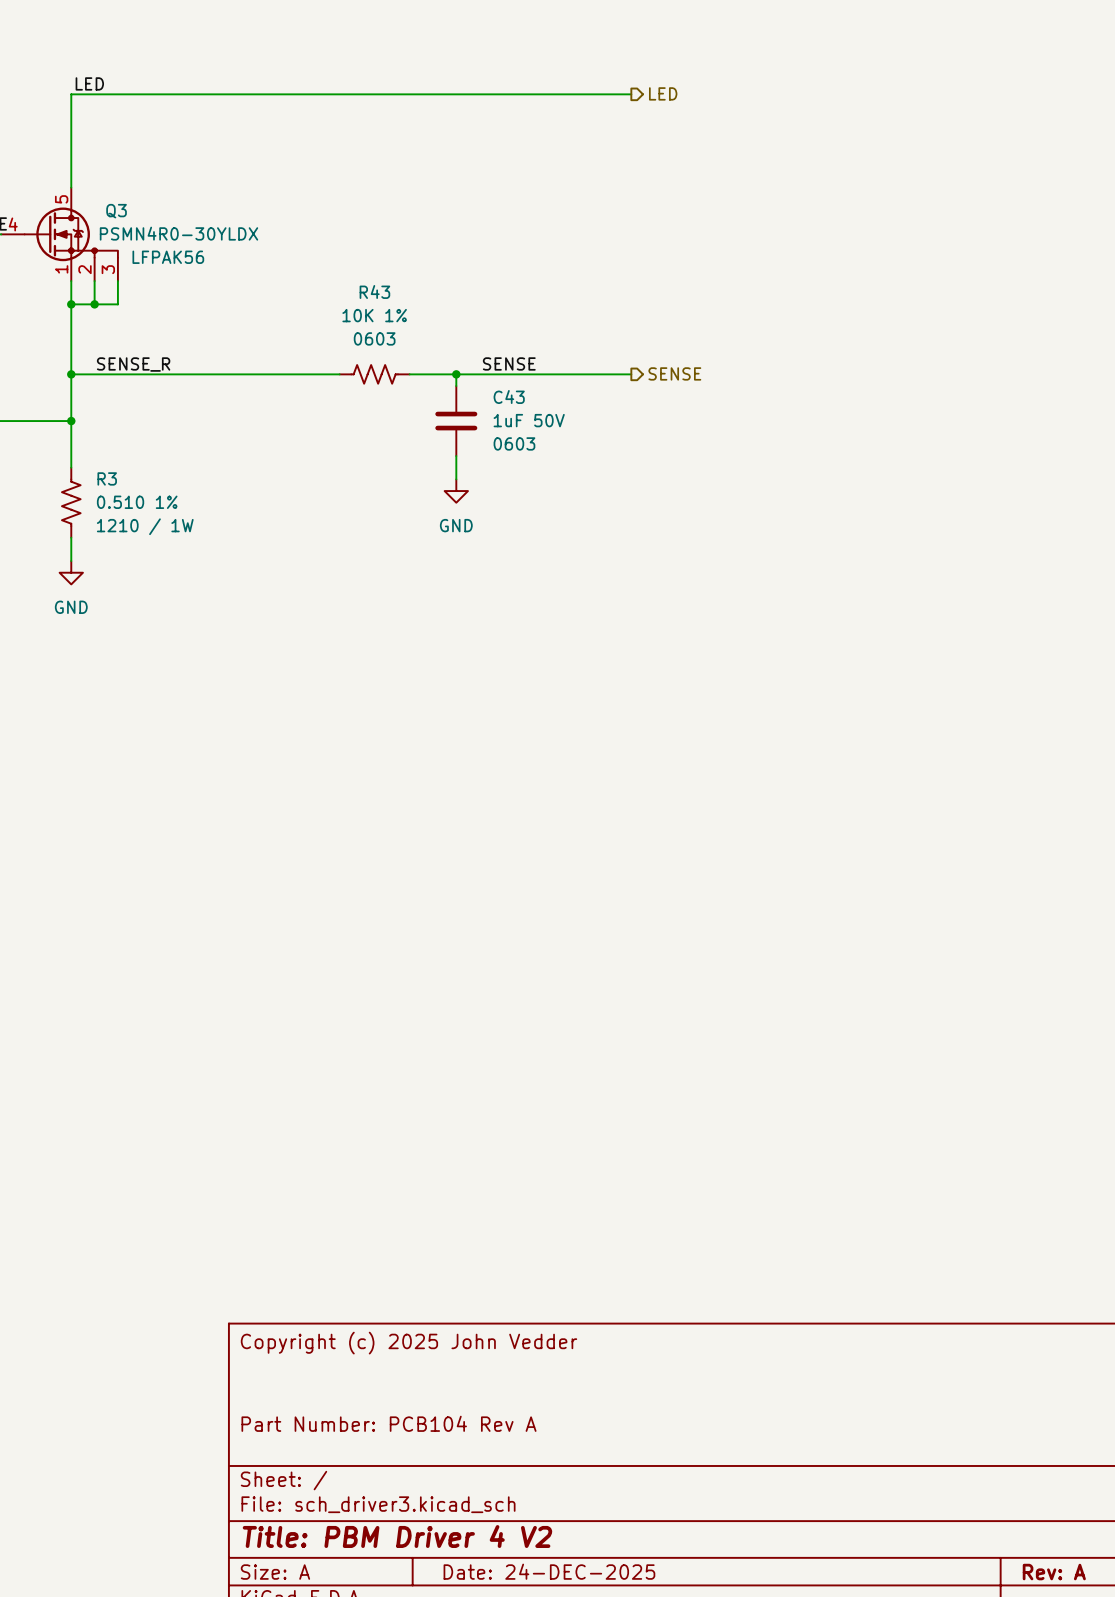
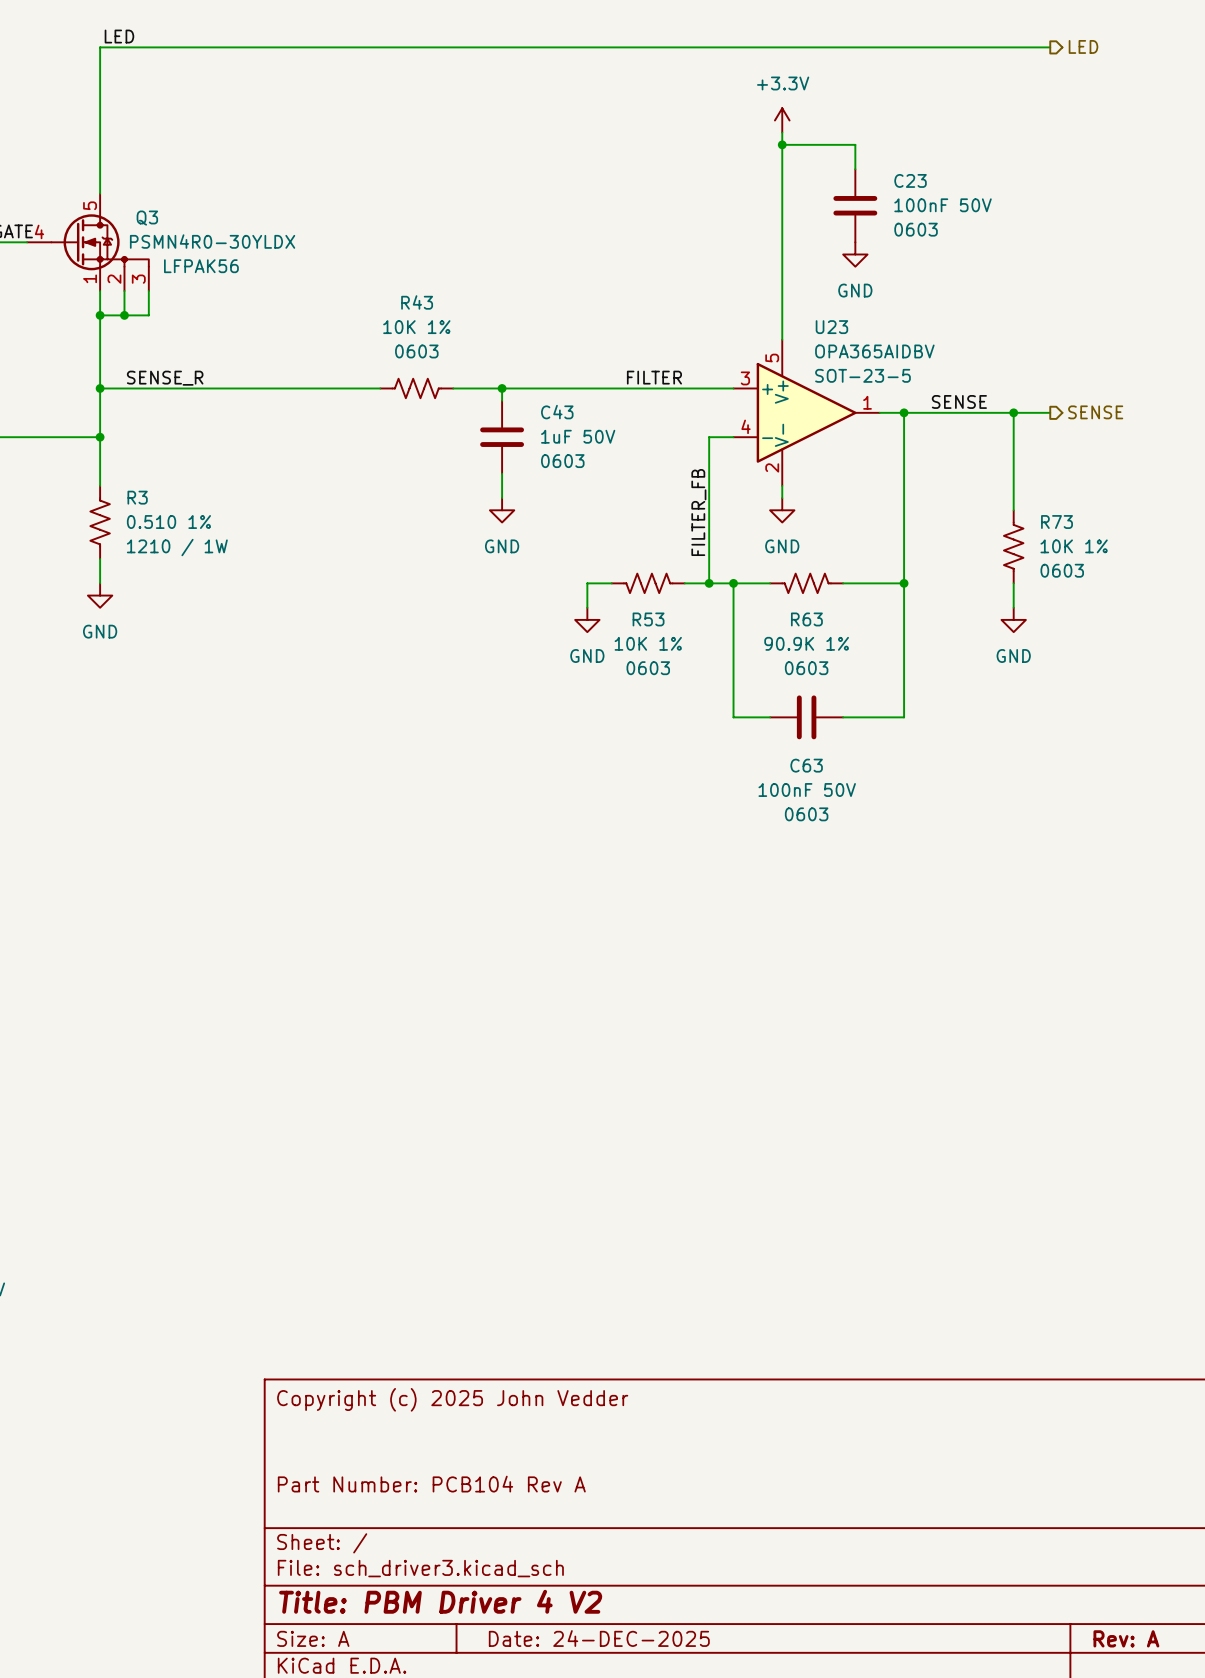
hierarchical label: none -> LED (1083, 46)
label position: LED (89, 83) -> LED (119, 36)
hierarchical label: LED (663, 93) -> none
wire: (71, 94) (631, 94) -> (100, 96) (100, 47) (1050, 47)
power symbol: none -> +3.3V (782, 120)
wire: none -> (782, 132) (782, 339)
wire: none -> (782, 144) (855, 144) (855, 169)
junction: none -> (782, 144)
C23: none -> 100nF 50V (855, 205)
power symbol: none -> GND (855, 254)
label: SENSE (509, 363) -> none
label: none -> FILTER (654, 377)
hierarchical label: SENSE (674, 373) -> none
wire: none -> (684, 388) (733, 388)
label: none -> SENSE (959, 401)
U23: none -> OPA365AIDBV (806, 412)
wire: none -> (879, 412) (1050, 412)
wire: none -> (904, 412) (904, 717) (843, 717)
junction: none -> (904, 412)
wire: none -> (1013, 412) (1013, 510)
junction: none -> (1013, 412)
hierarchical label: none -> SENSE (1095, 412)
wire: none -> (733, 437) (709, 437) (709, 583)
wire: none -> (782, 485) (782, 498)
power symbol: none -> GND (782, 510)
label: none -> FILTER_FB (698, 512)
R73: none -> 10K 1% (1013, 546)
wire: none -> (611, 583) (587, 583) (587, 607)
R53: none -> 10K 1% (648, 583)
wire: none -> (684, 583) (770, 583)
junction: none -> (709, 583)
wire: none -> (733, 583) (733, 717) (770, 717)
junction: none -> (733, 583)
R63: none -> 90.9K 1% (806, 583)
wire: none -> (843, 583) (904, 583)
junction: none -> (904, 583)
wire: none -> (1013, 583) (1013, 607)
power symbol: none -> GND (587, 619)
power symbol: none -> GND (1013, 619)
C63: none -> 100nF 50V (806, 717)

